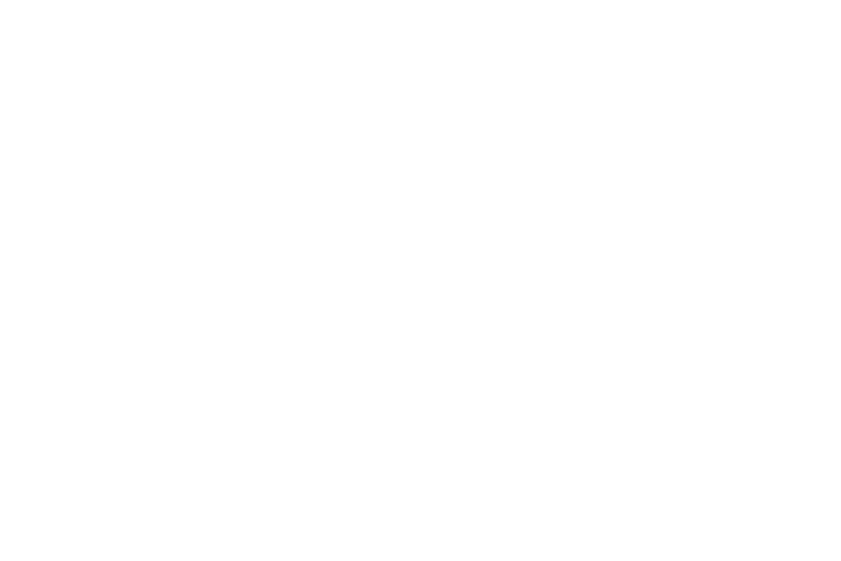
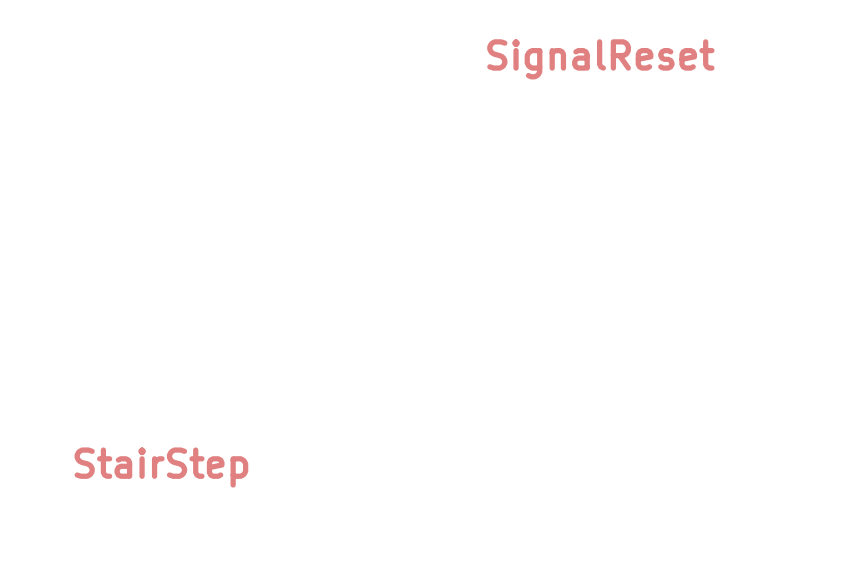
text: none -> SignalReset (600, 59)
text: none -> StairStep (161, 467)

